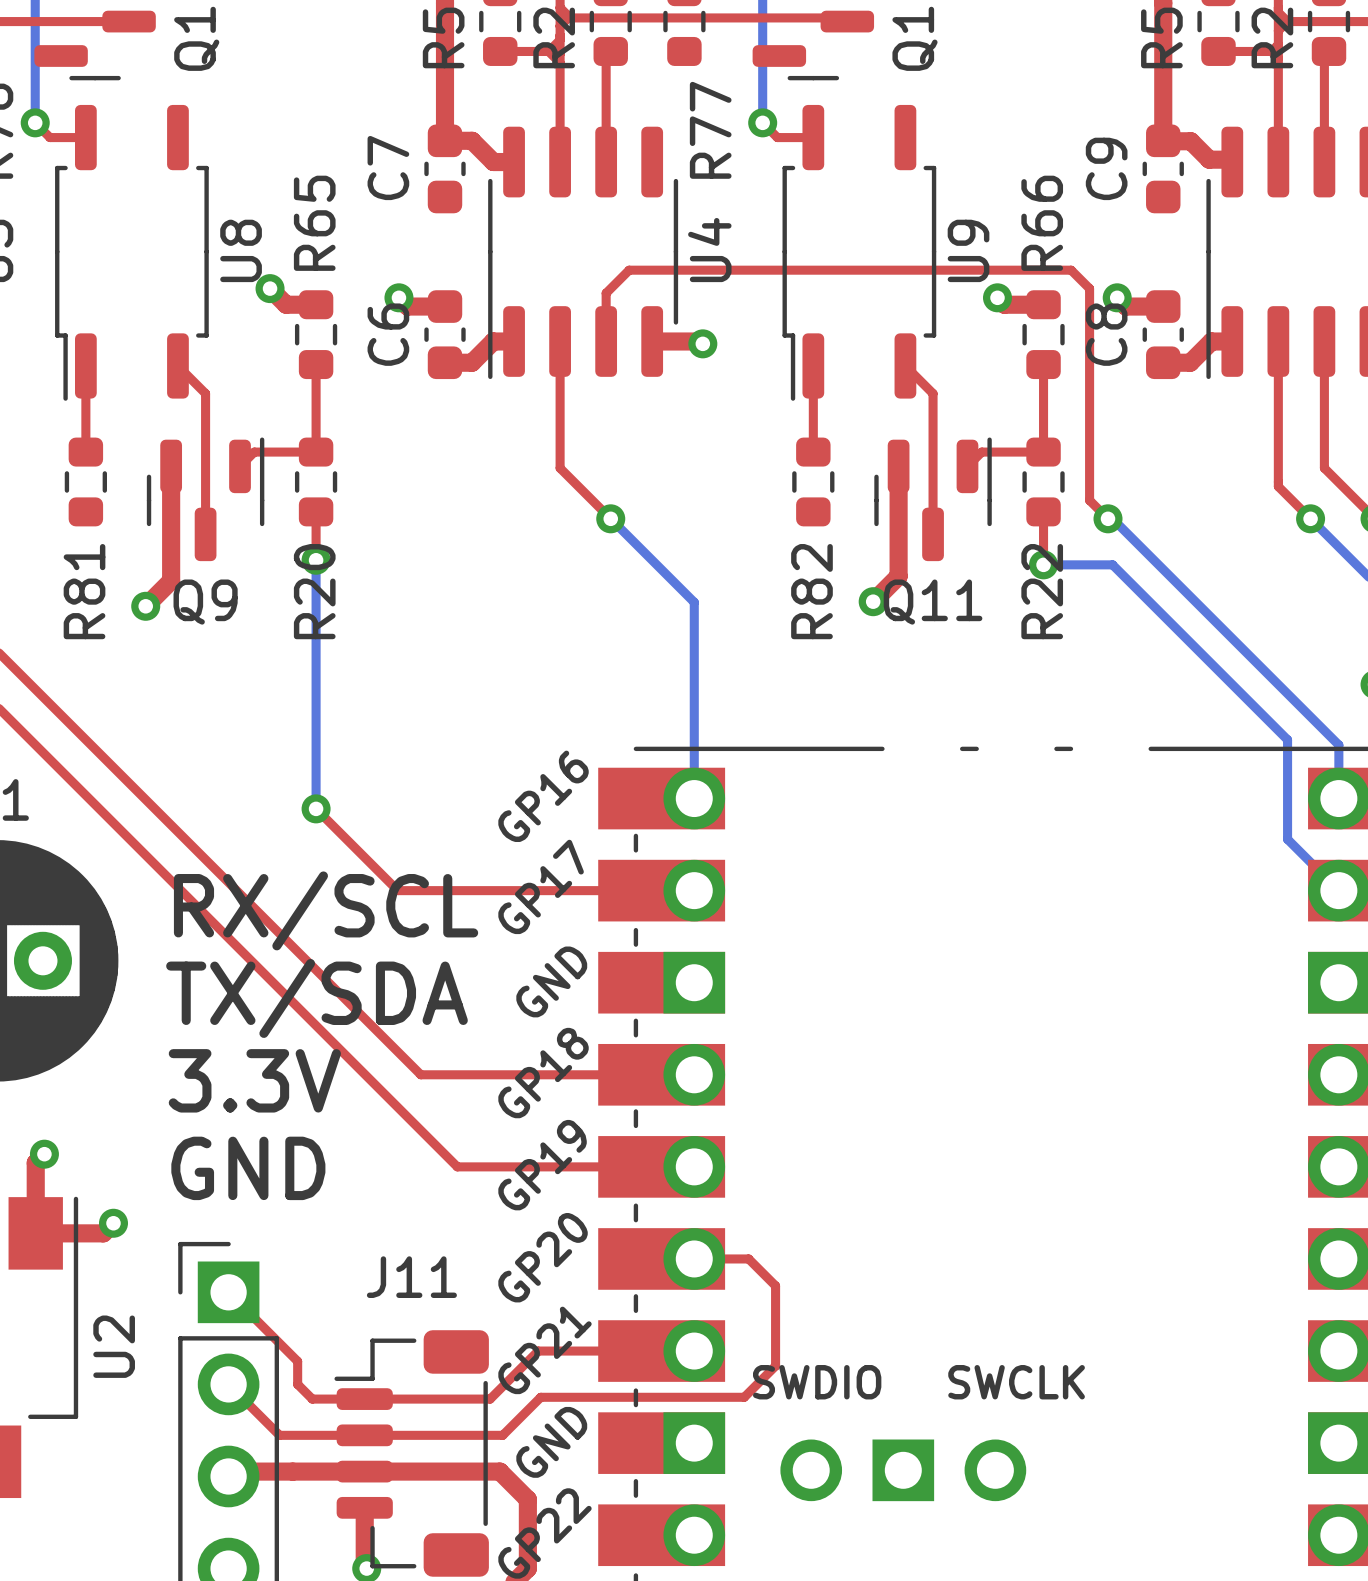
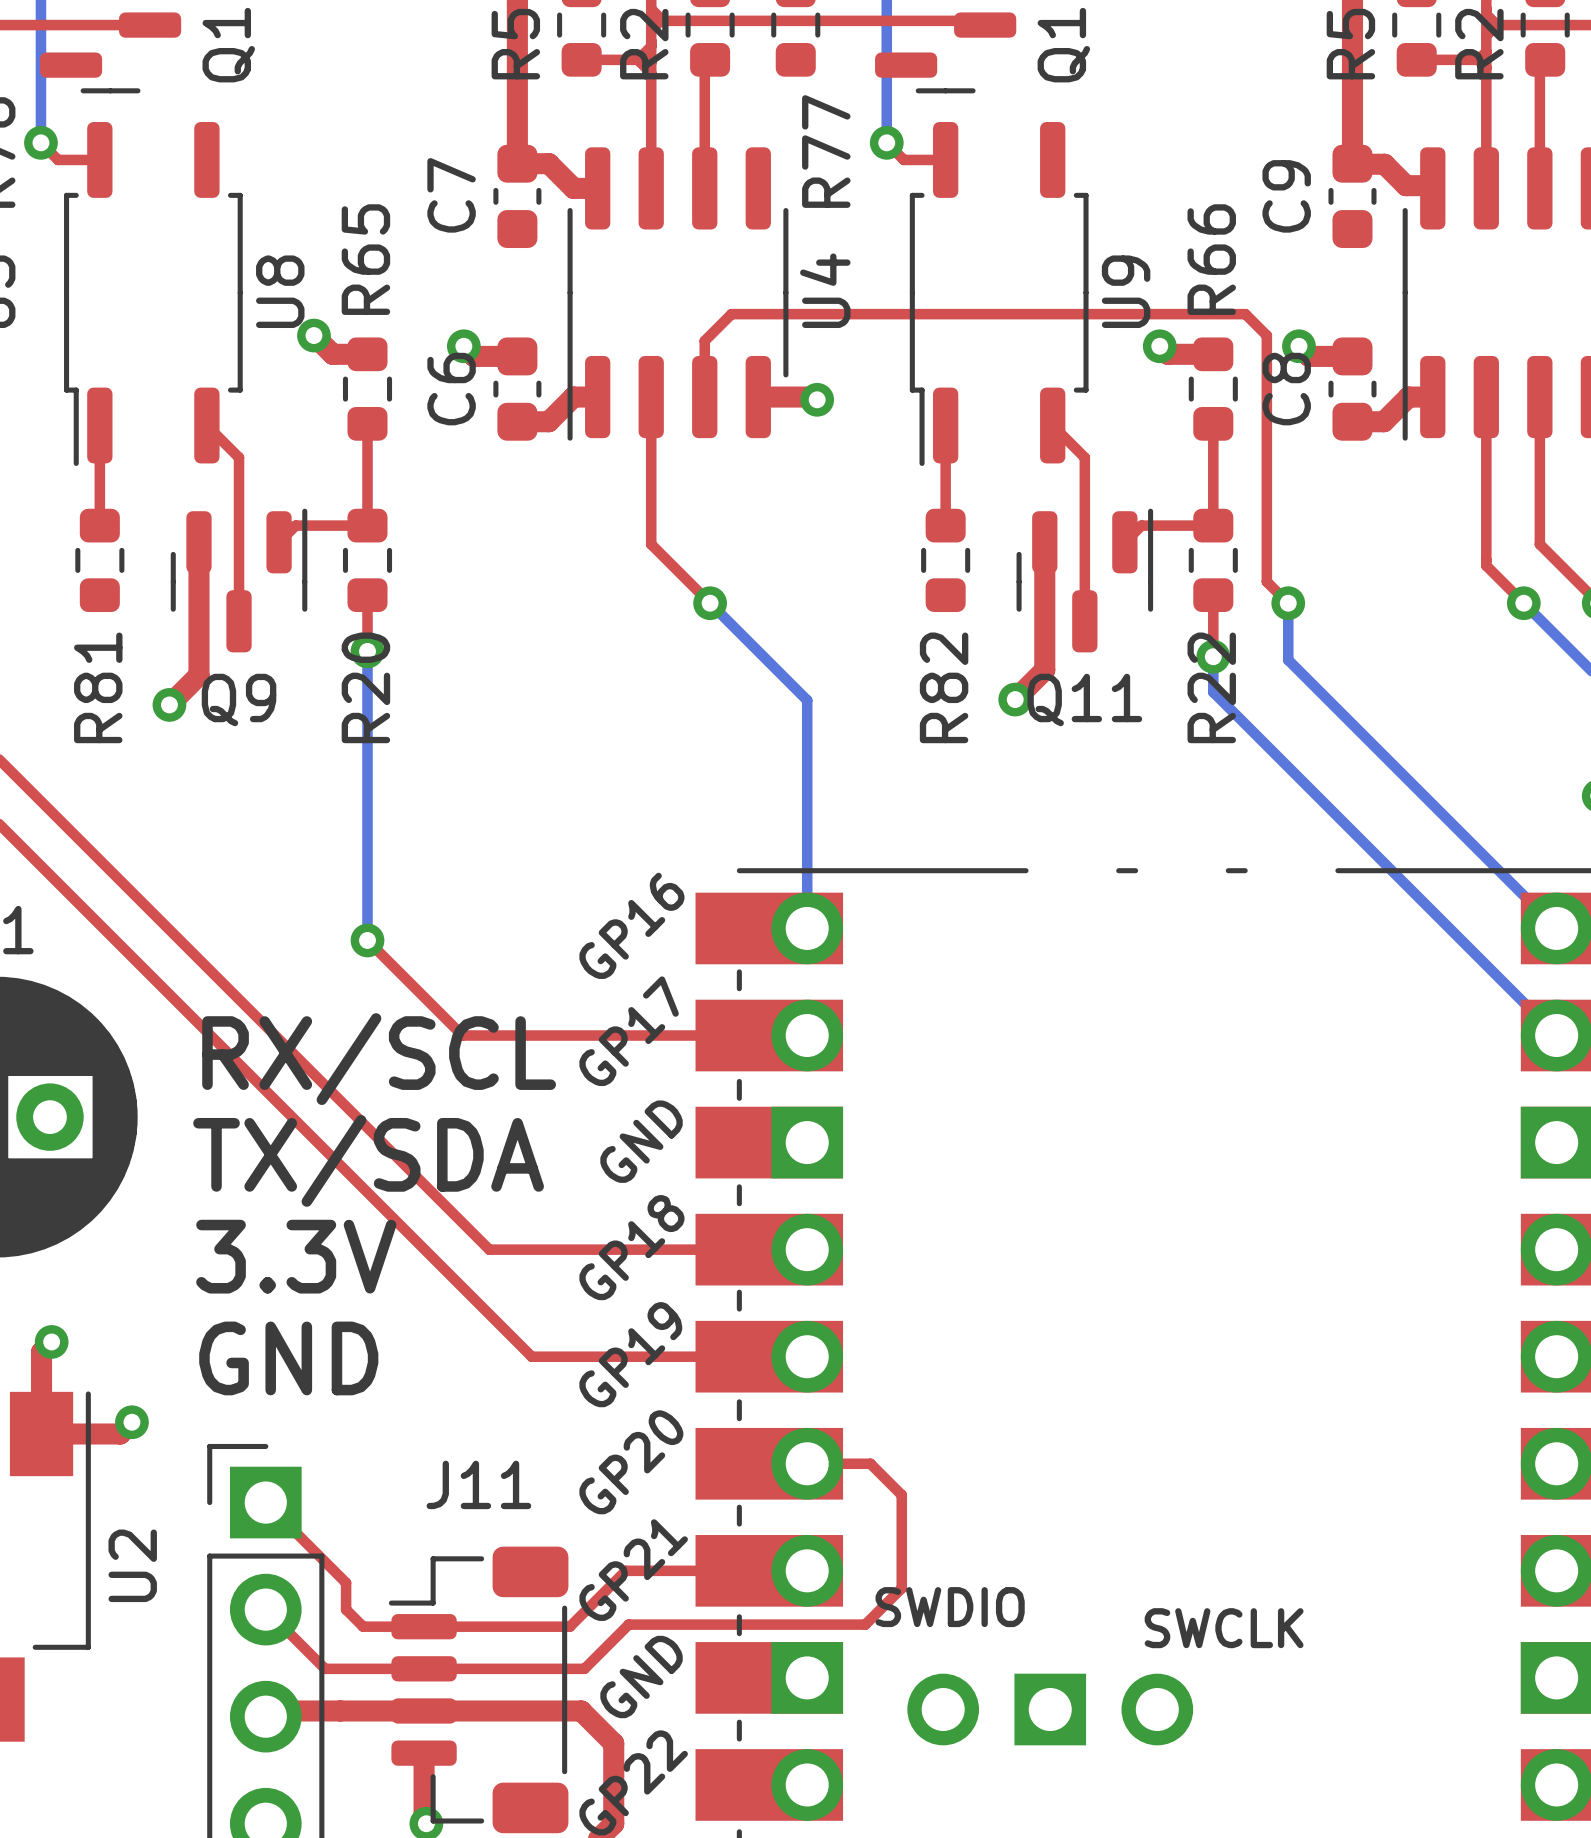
bottom track: (1108, 518) (1112, 518) (1338, 745) (1338, 798) -> (1288, 603) (1288, 660) (1556, 928)
bottom track: (1043, 564) (1112, 564) (1287, 739) (1287, 839) -> (1213, 656) (1213, 692) (1497, 975)
part text position: SWCLK (1016, 1382) -> SWCLK (1224, 1628)

